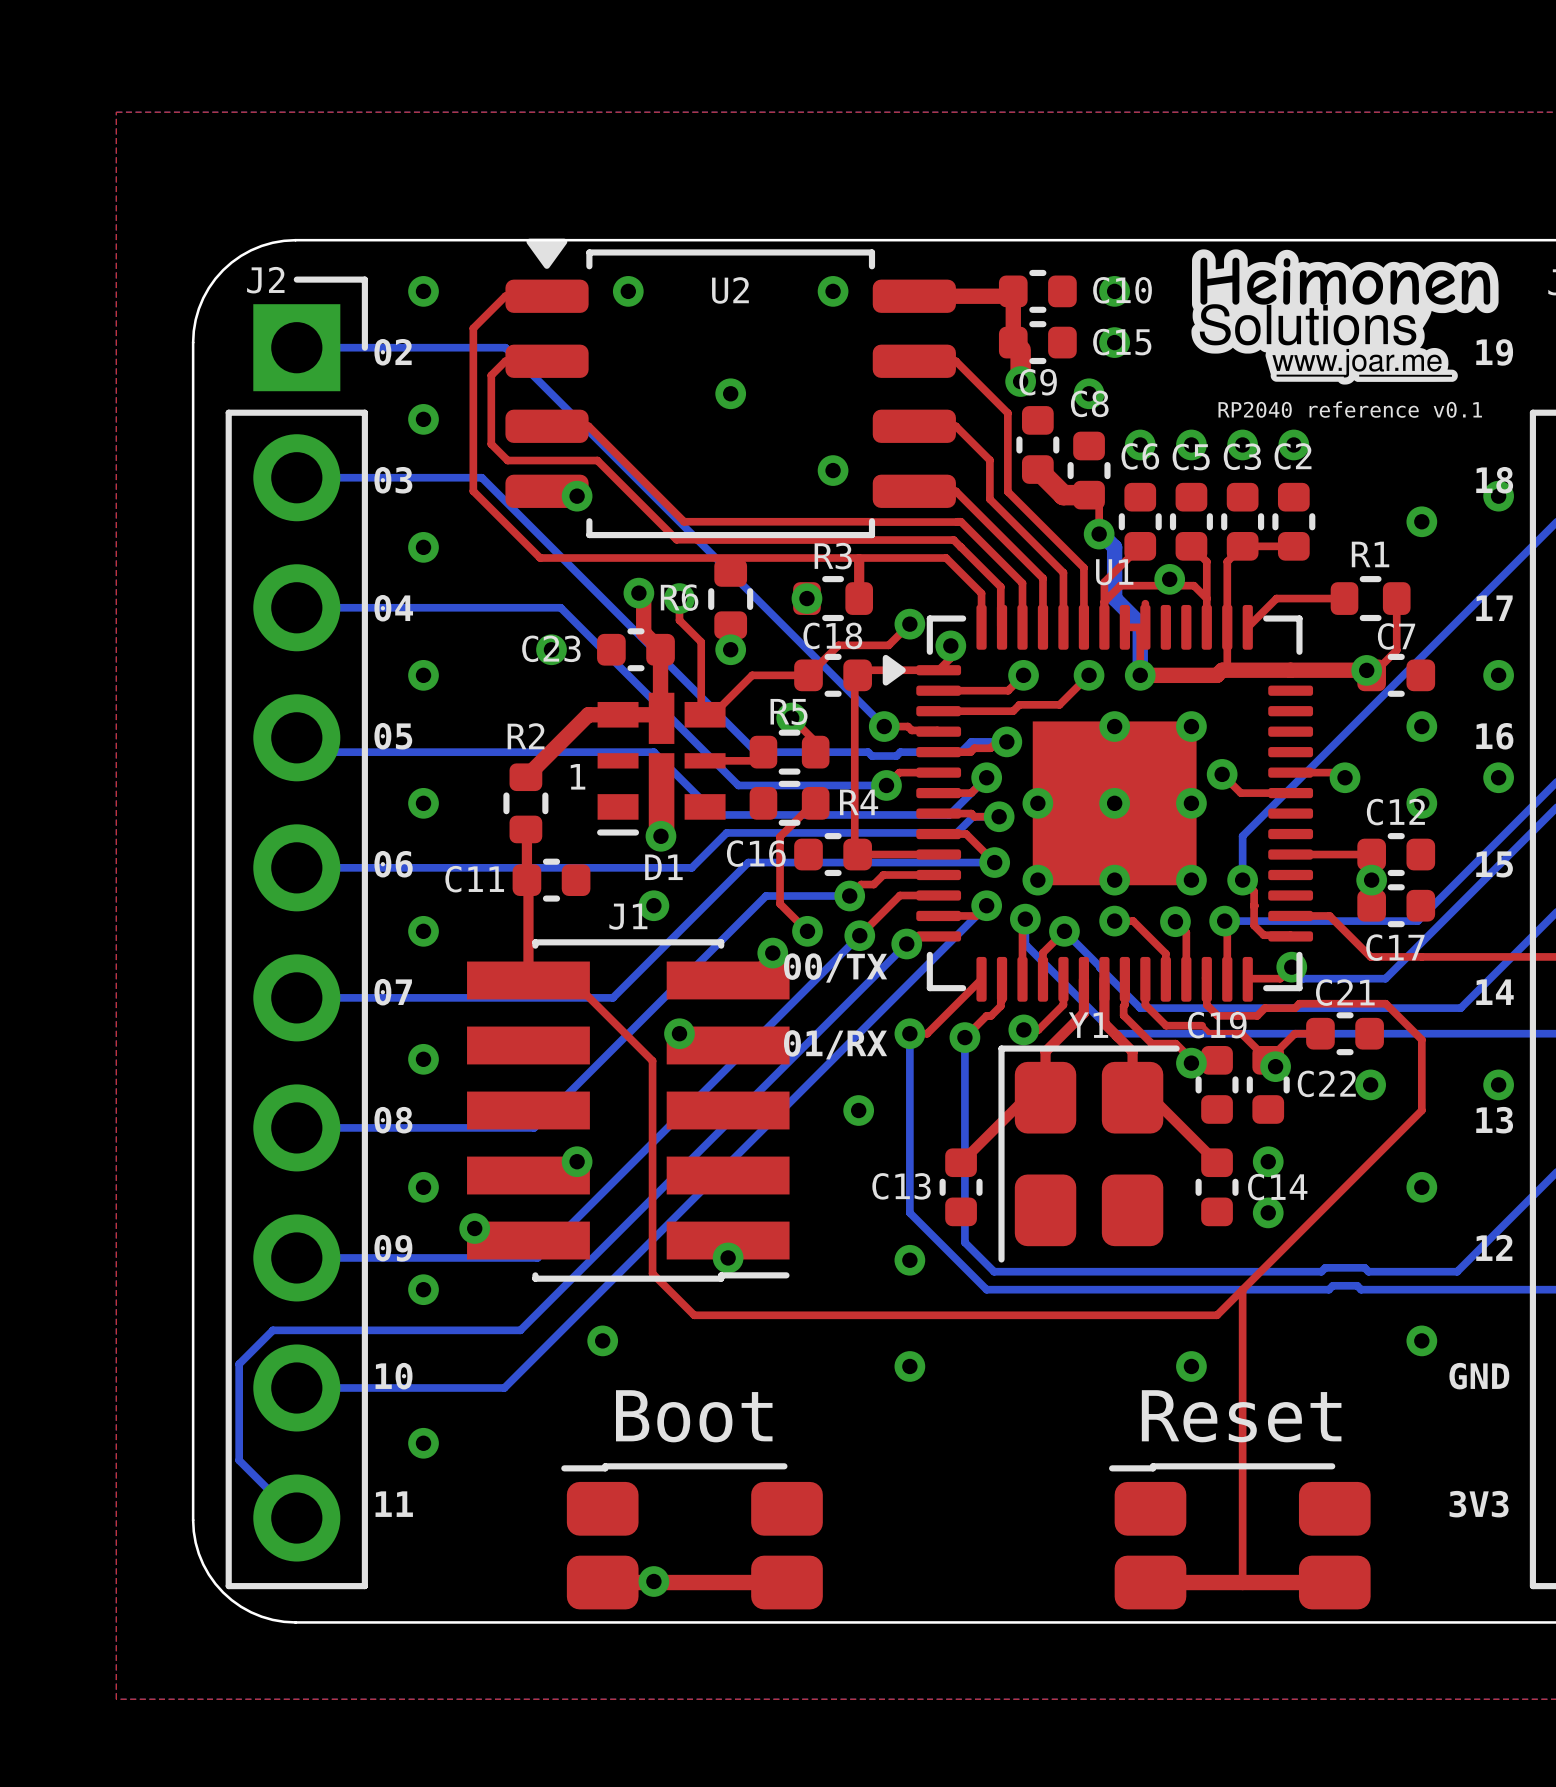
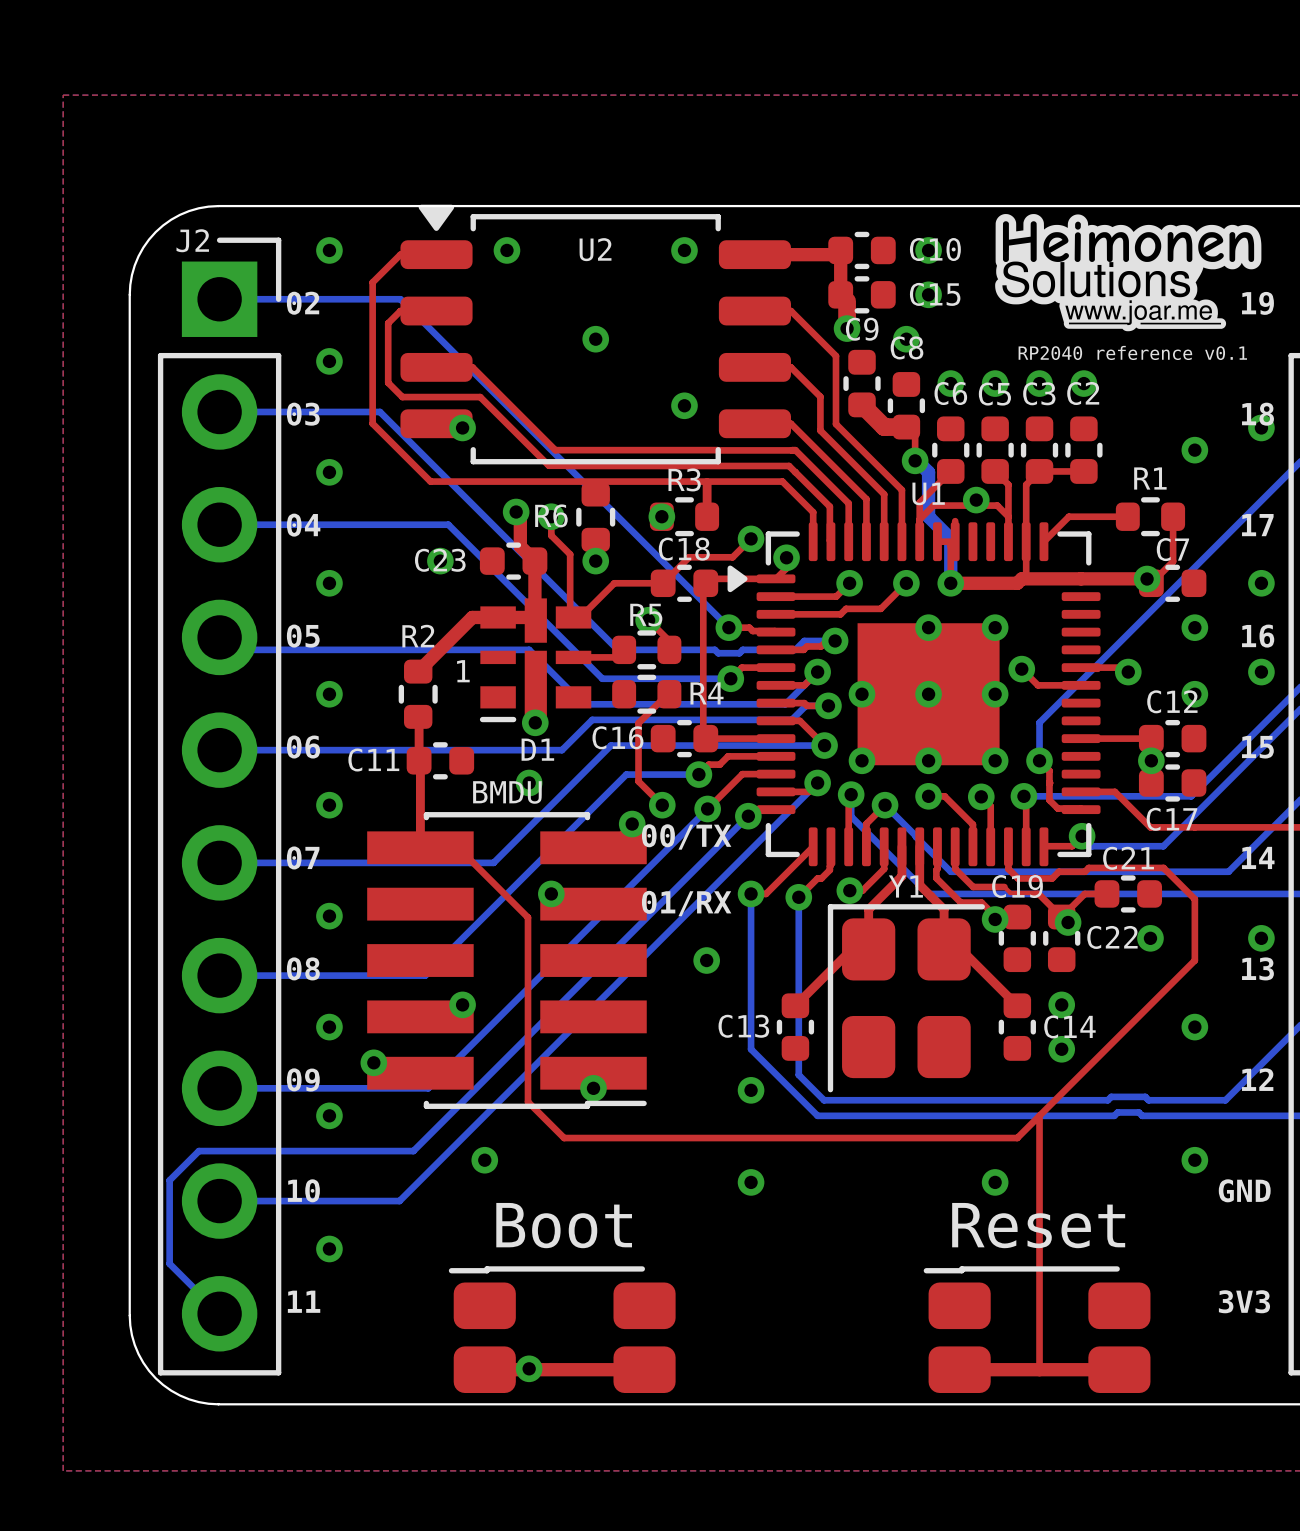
J1 name: J1 (628, 916) -> BMDU (507, 792)

